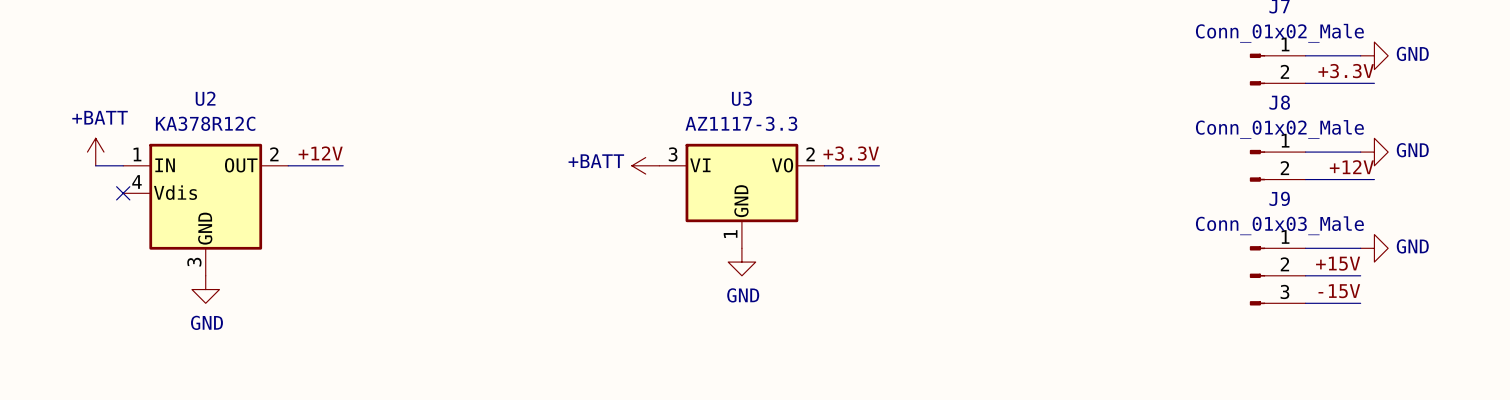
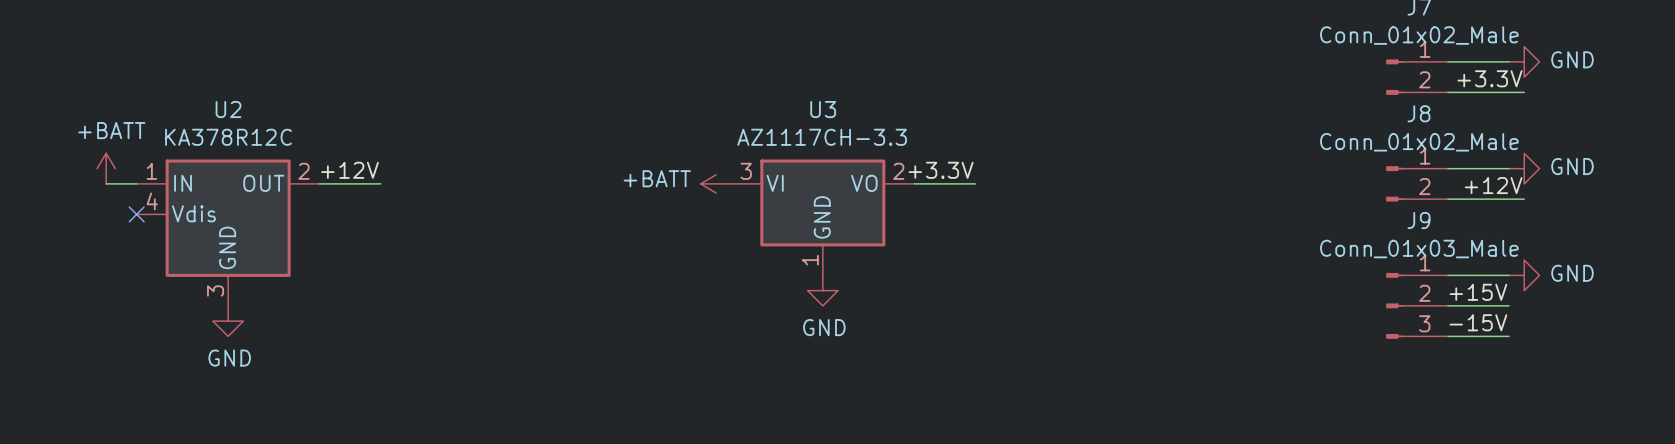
U3 value: AZ1117-3.3 (741, 123) -> AZ1117CH-3.3 (822, 137)

